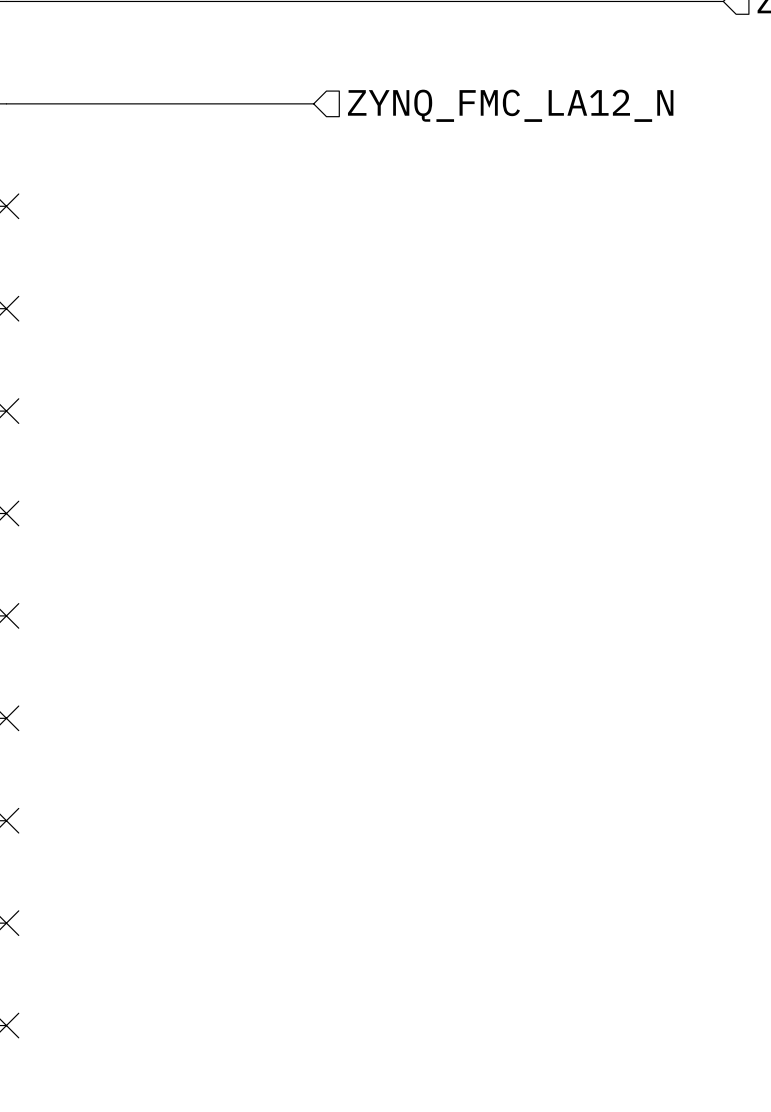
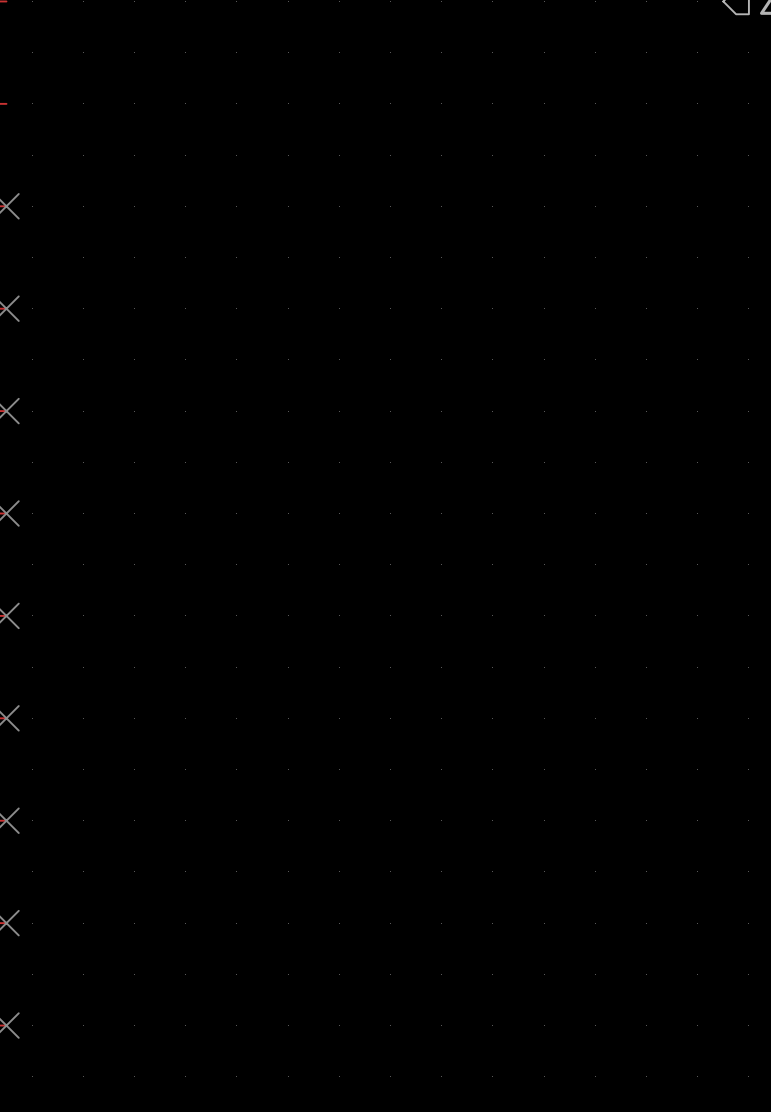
wire: (6, 1) (723, 1) -> none
wire: (6, 103) (313, 103) -> none
hierarchical label: ZYNQ_FMC_LA12_N (510, 105) -> none

